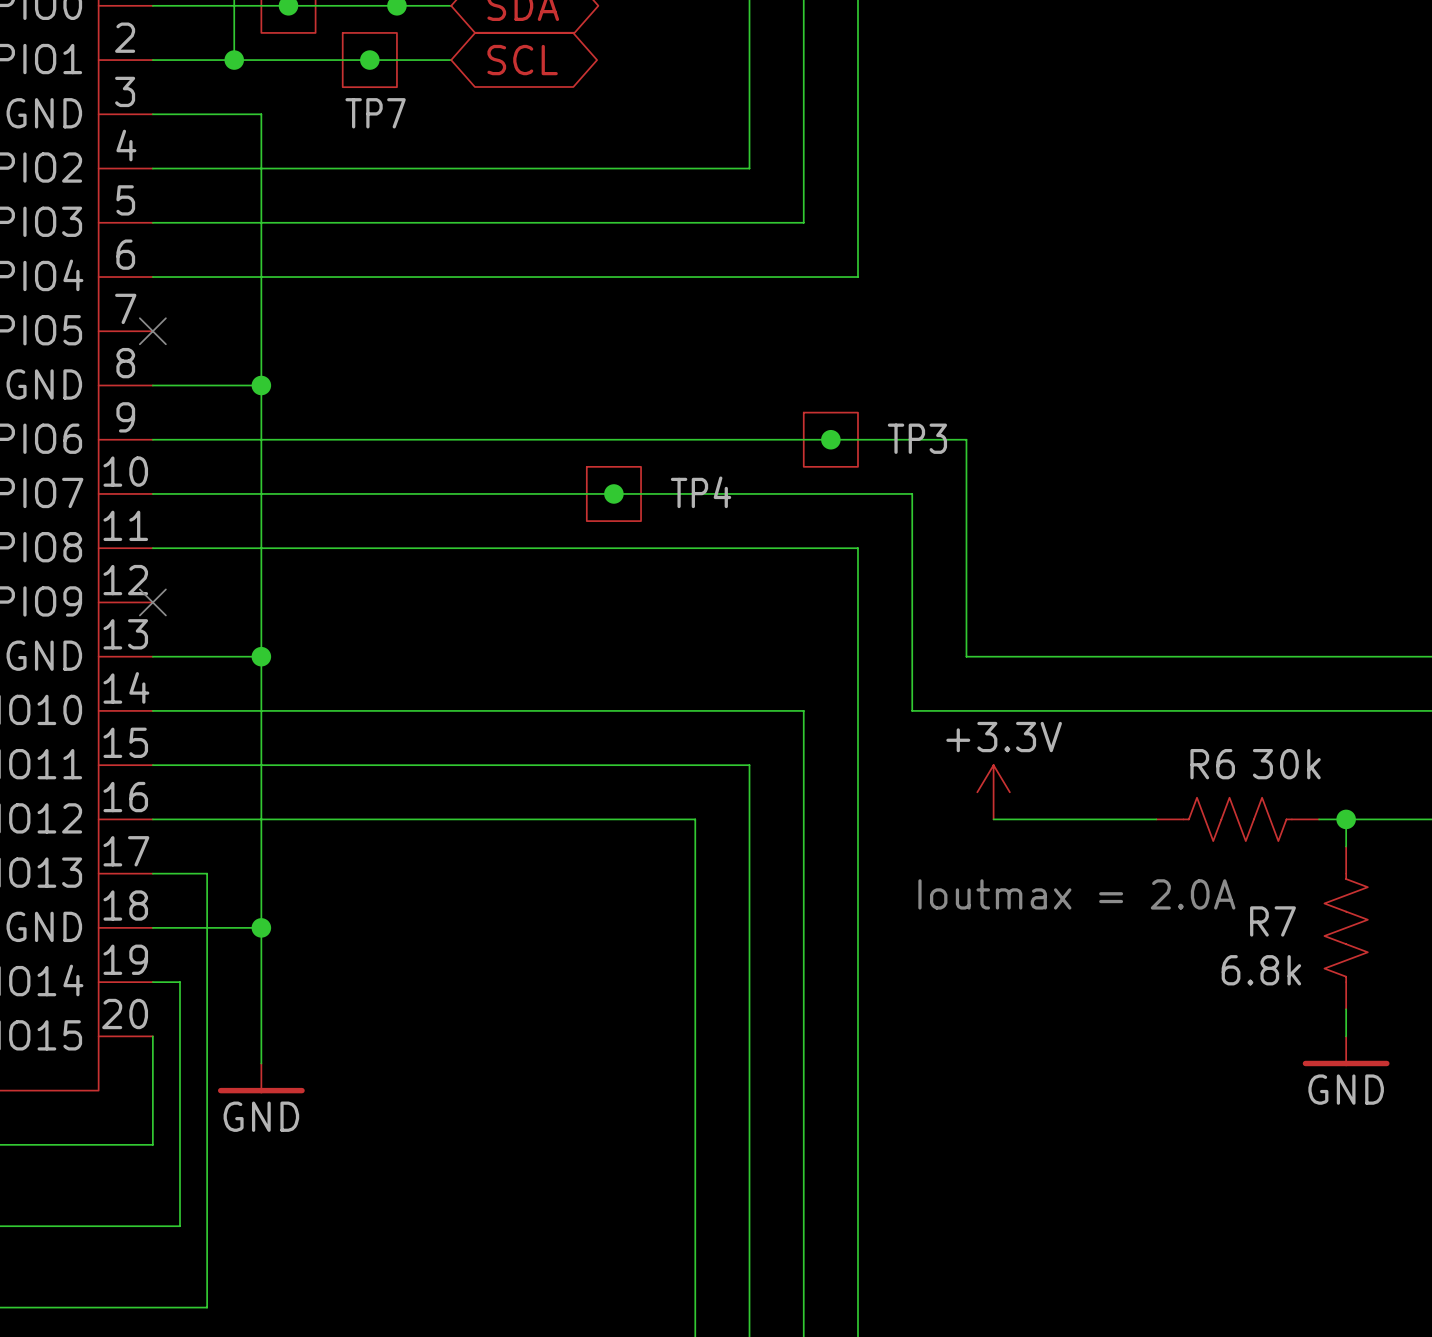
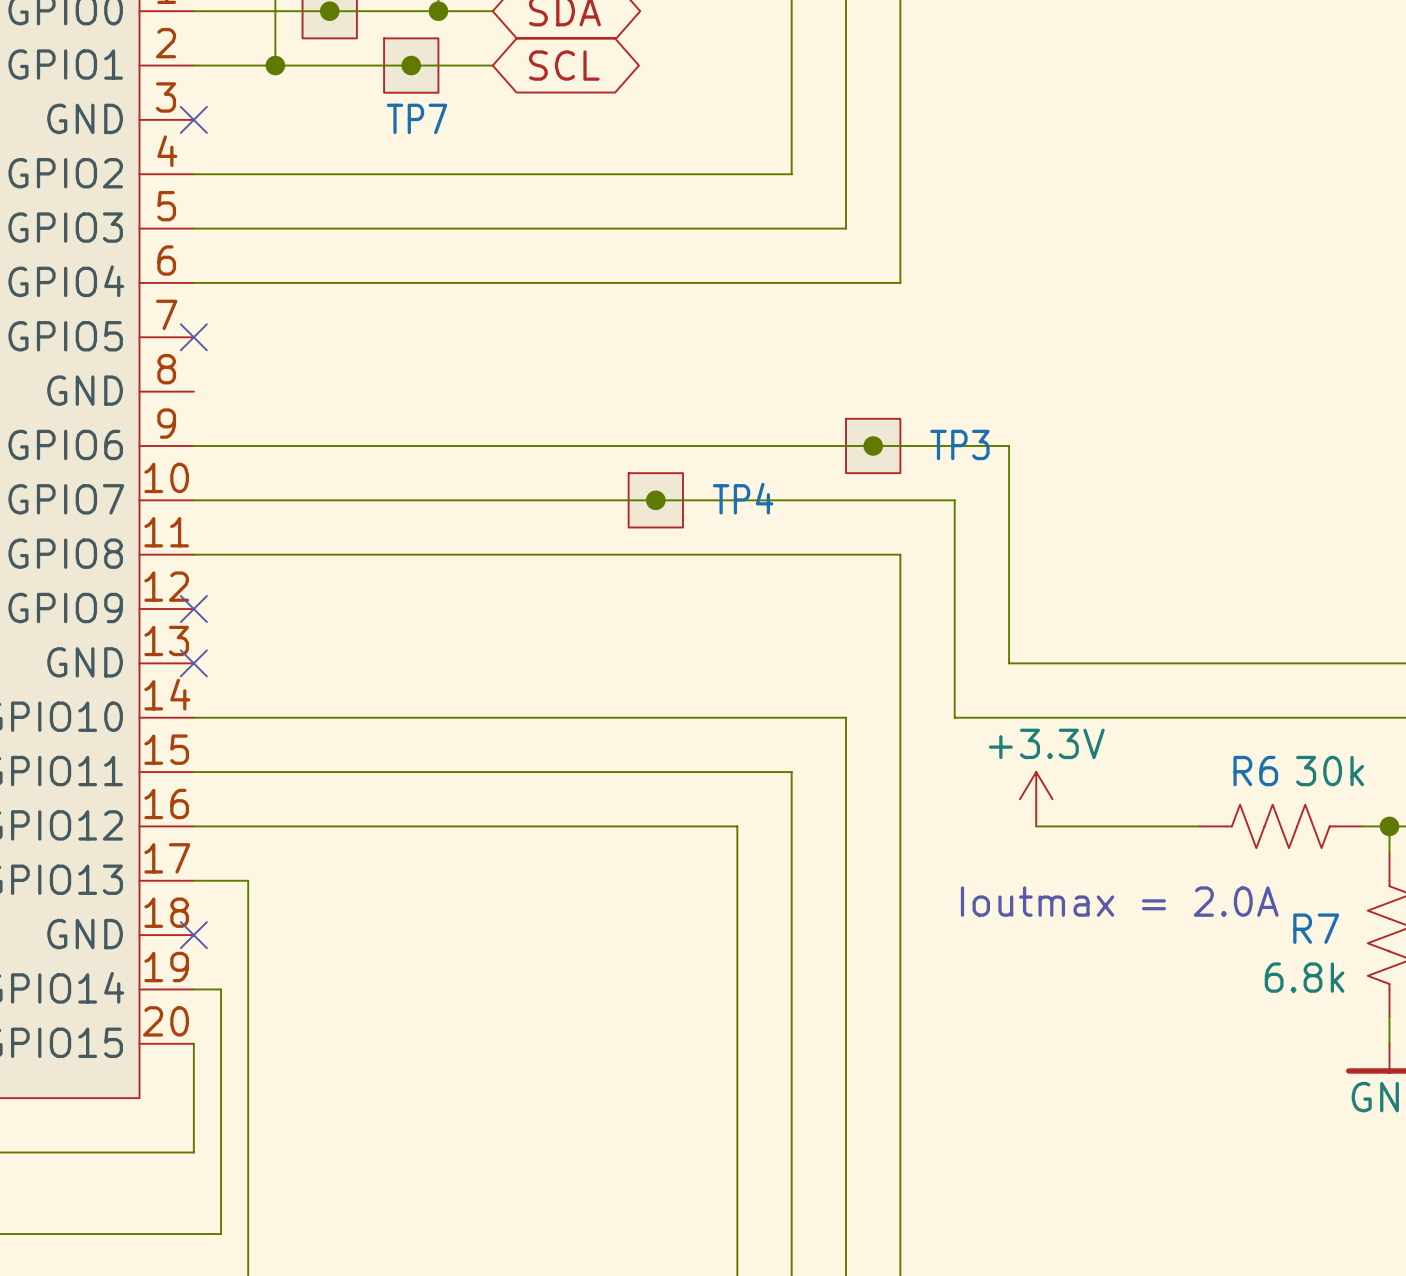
wire: (152, 114) (261, 114) (261, 1063) -> none
no-connect mark: none -> (193, 119)
wire: (152, 385) (261, 385) -> none
junction: (261, 385) -> none
wire: (152, 656) (261, 656) -> none
no-connect mark: none -> (193, 663)
junction: (261, 656) -> none
wire: (152, 927) (261, 927) -> none
no-connect mark: none -> (193, 935)
junction: (261, 927) -> none
power symbol: GND (261, 1078) -> none

